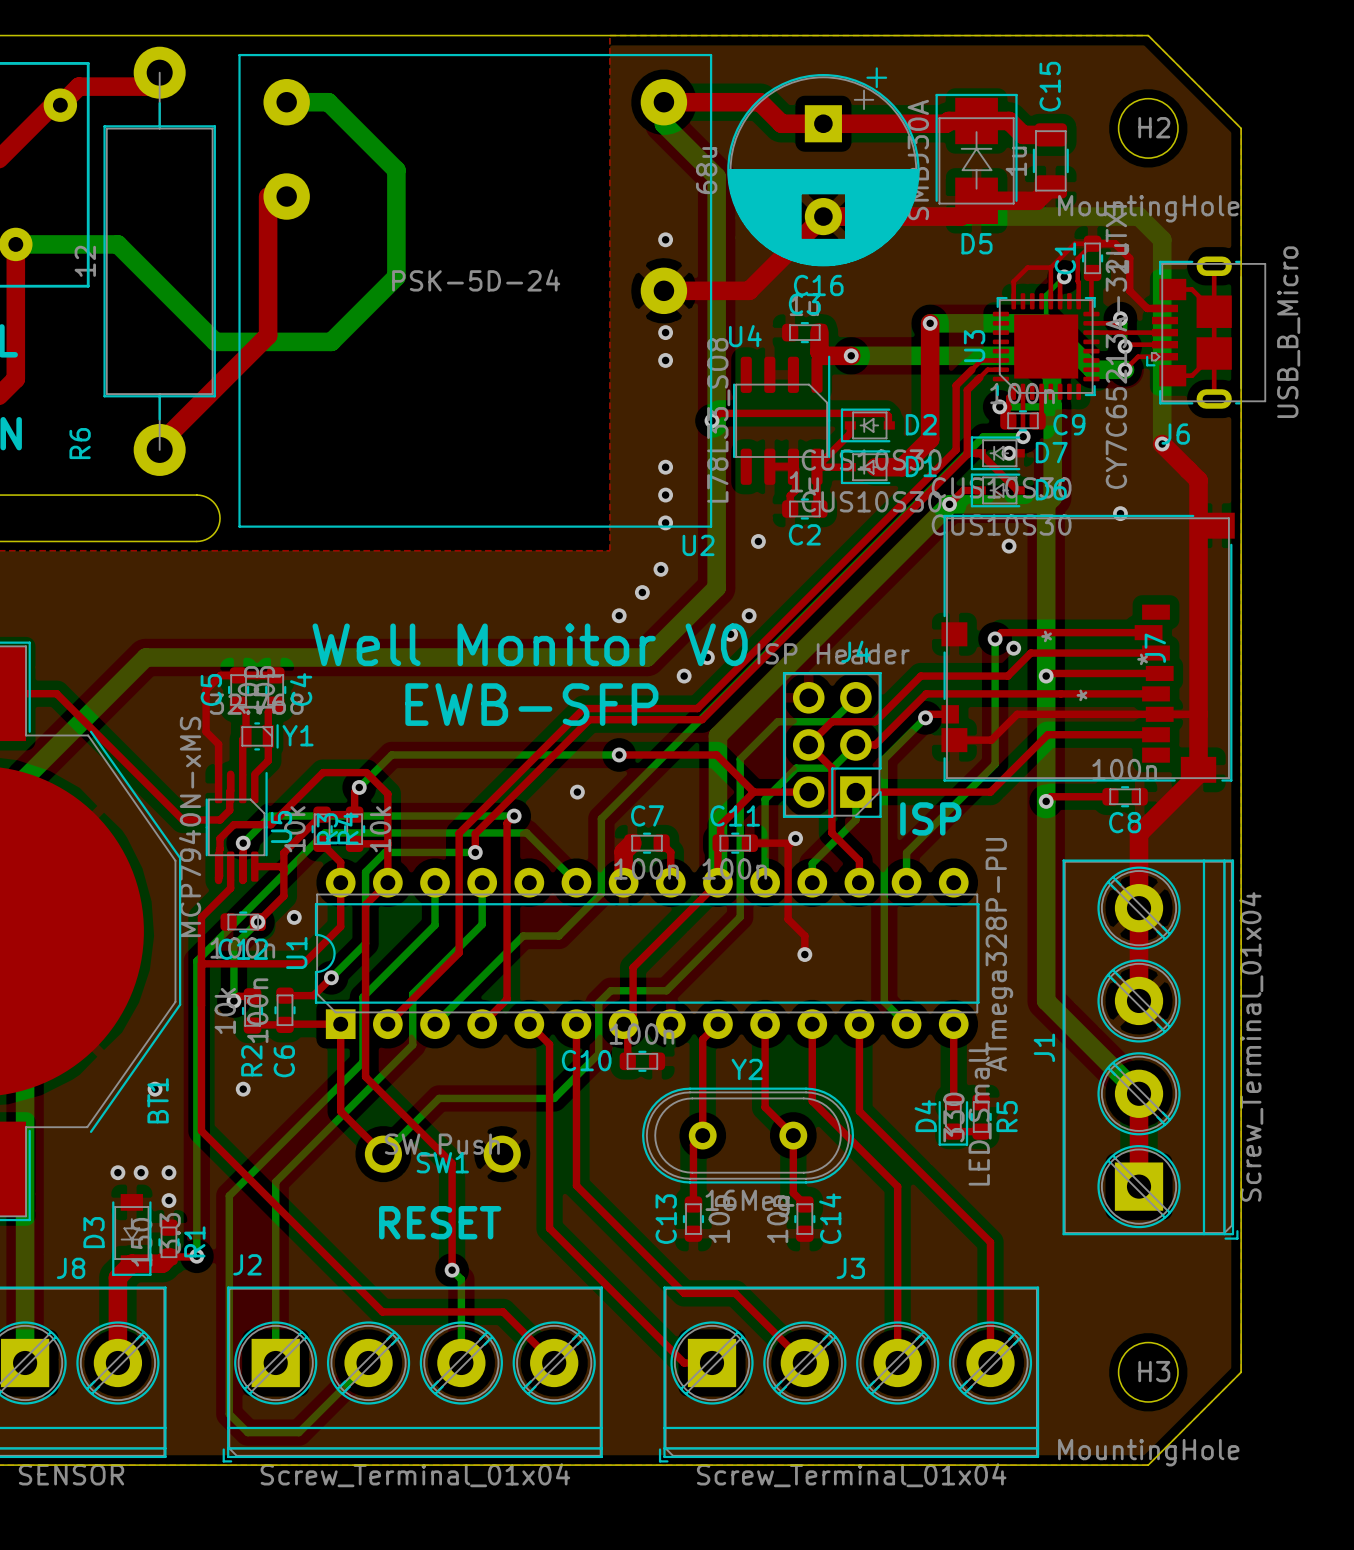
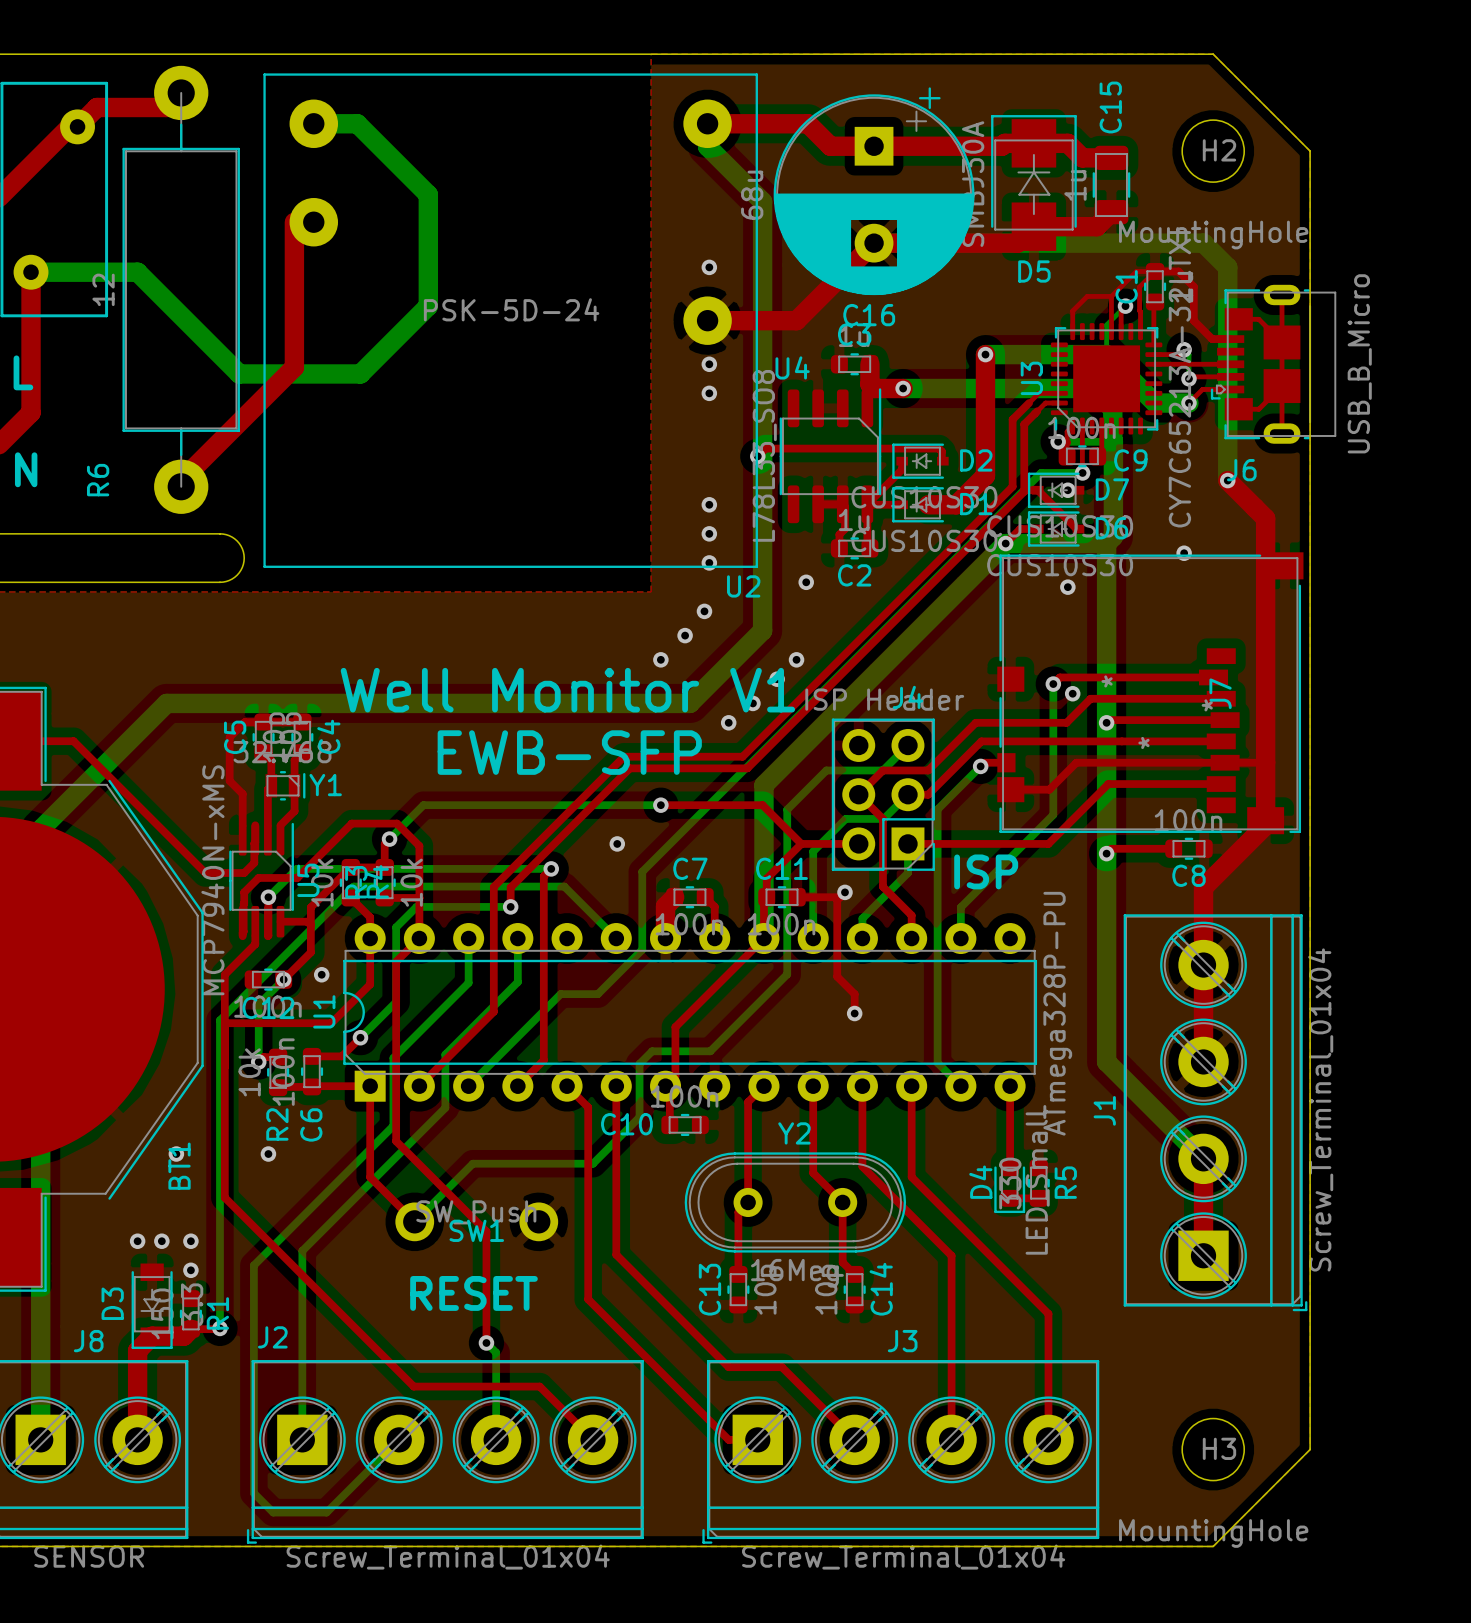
text: Well Monitor V0 (530, 644) -> Well Monitor V1 (567, 690)

